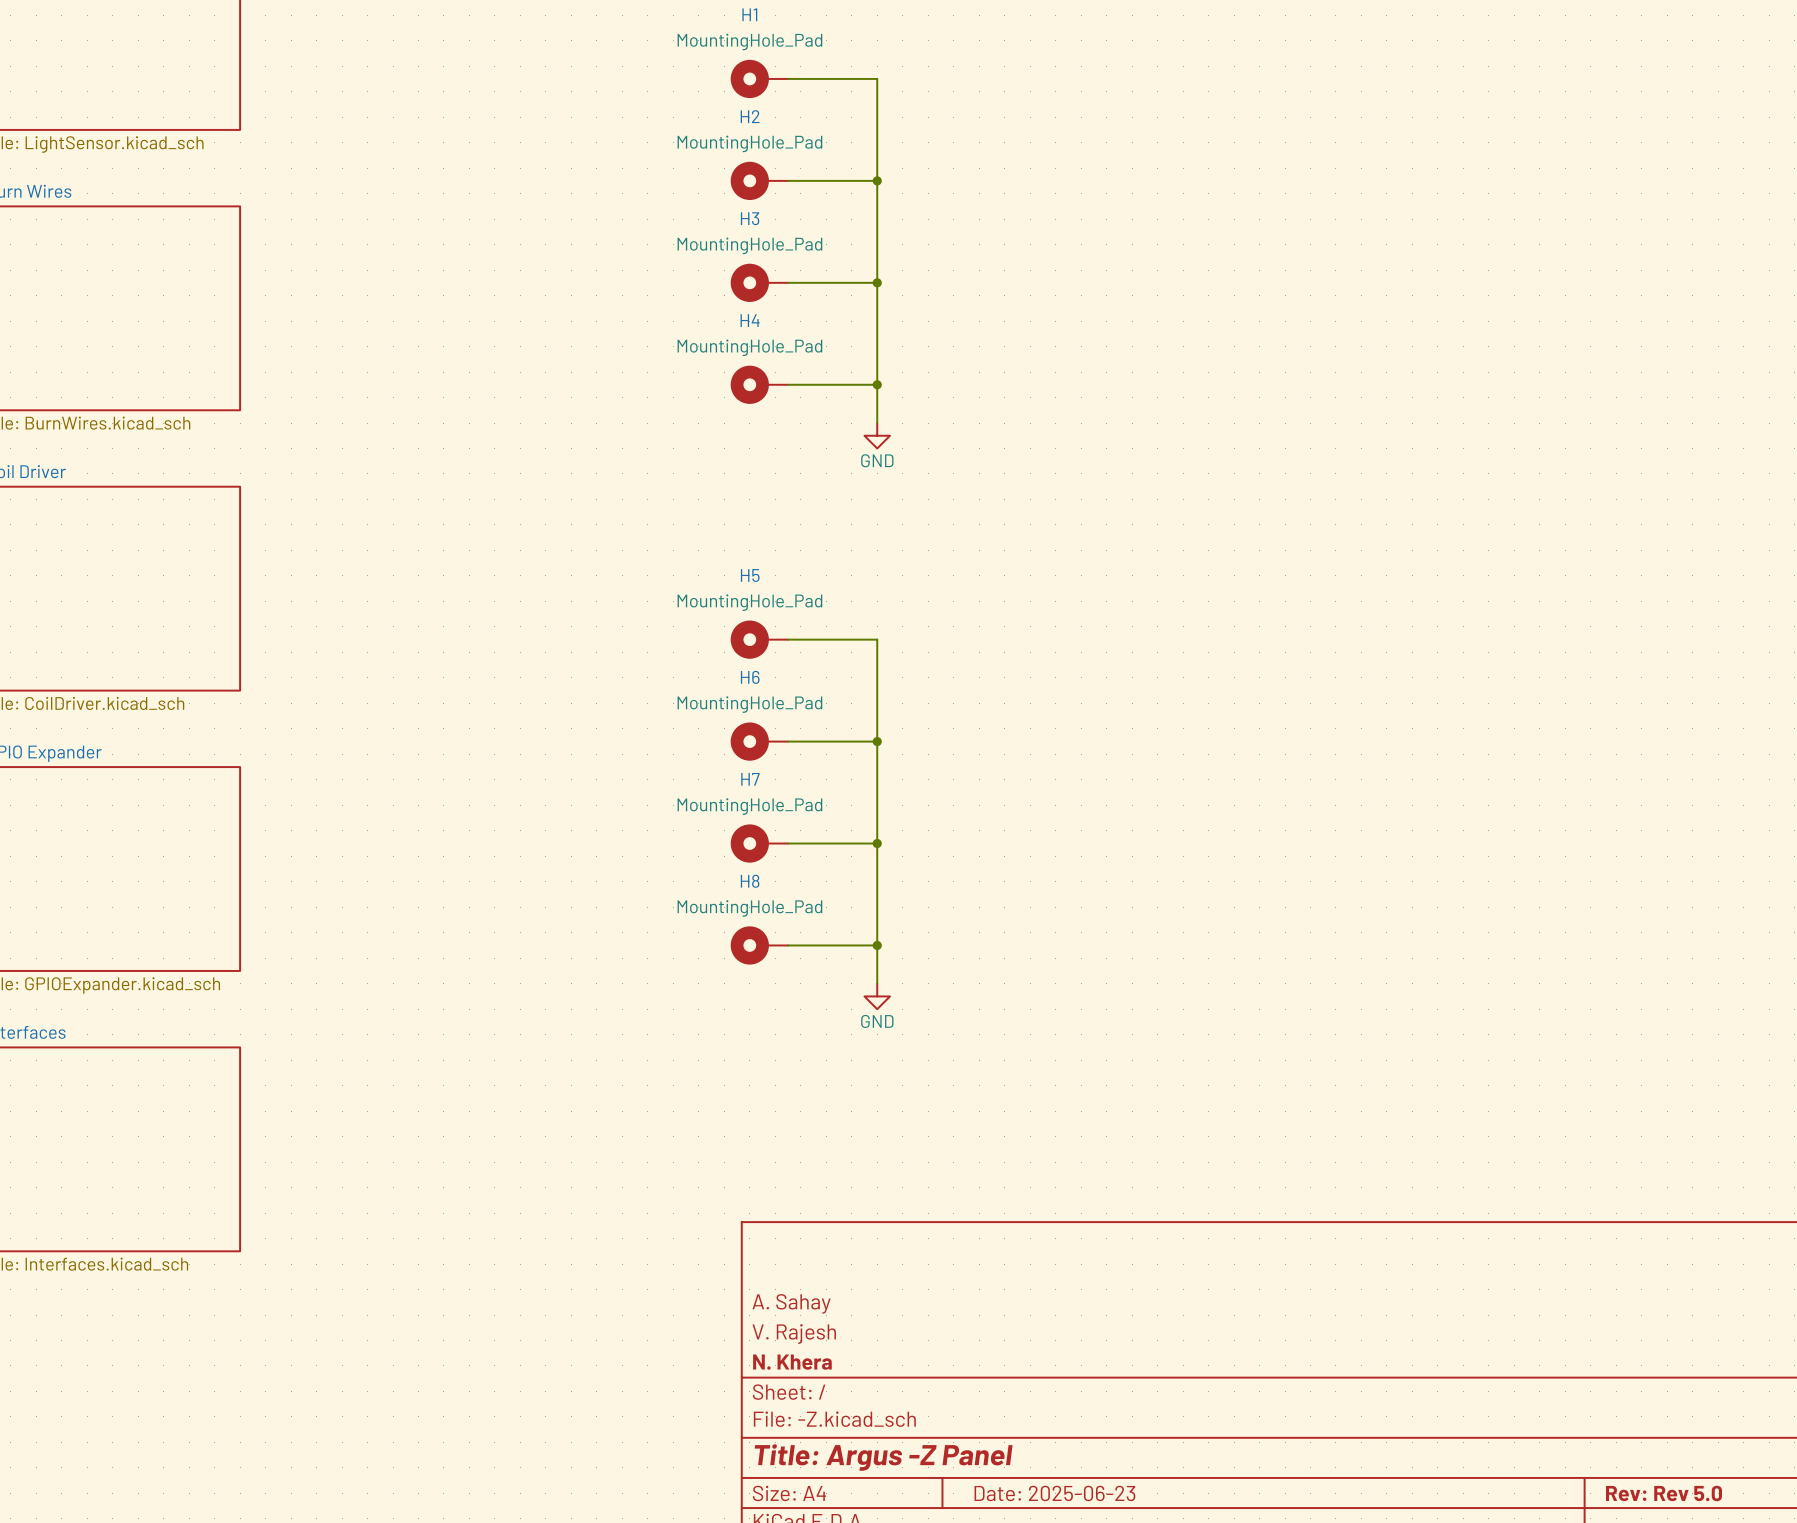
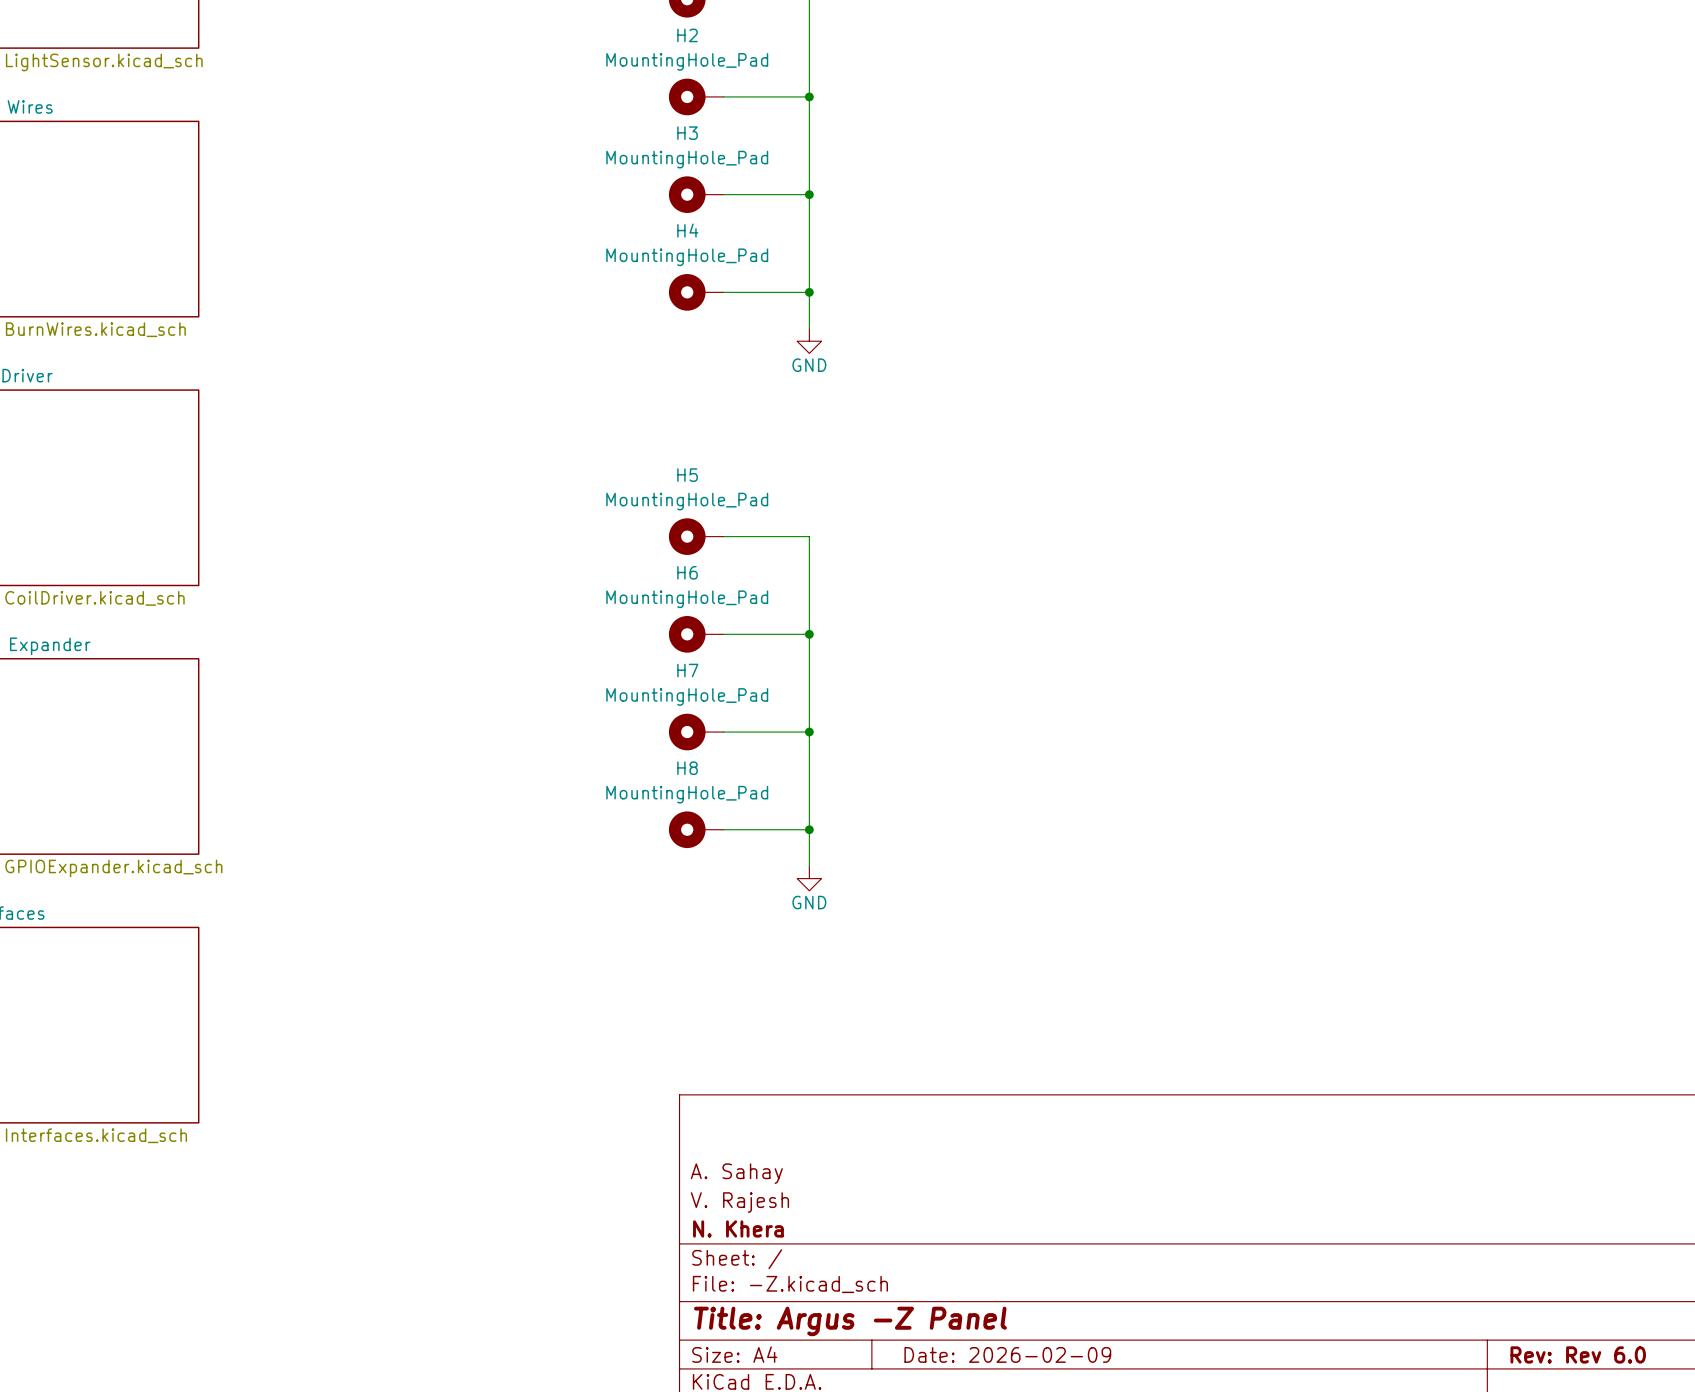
title block: Date: 2025-06-23 (1054, 1493) -> Date: 2026-02-09 (1007, 1354)
title block: Rev: Rev 5.0 (1663, 1493) -> Rev: Rev 6.0 (1578, 1354)

